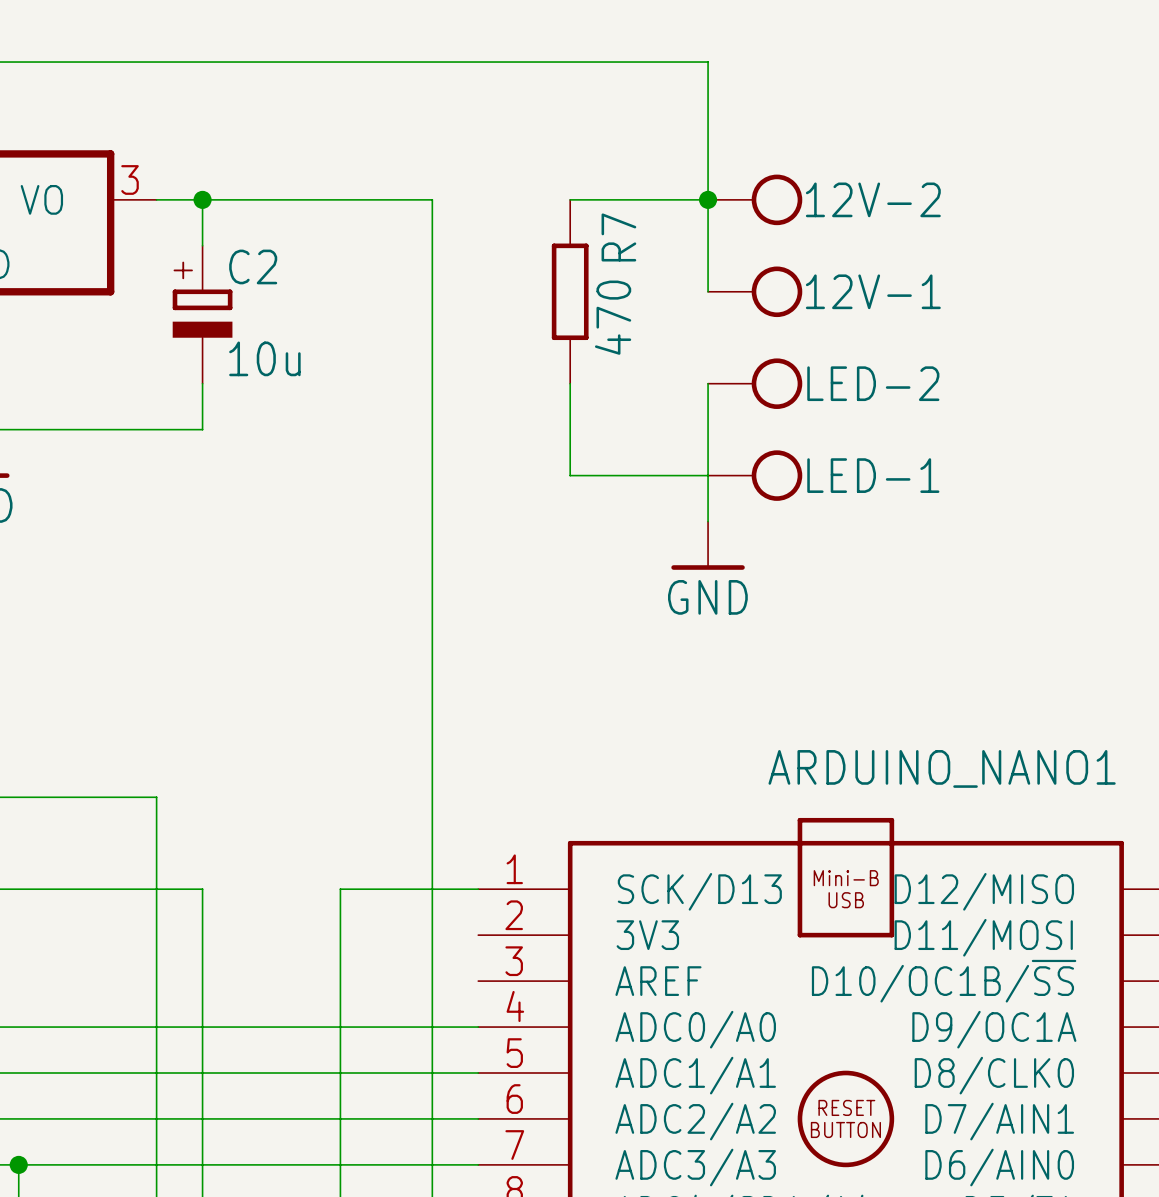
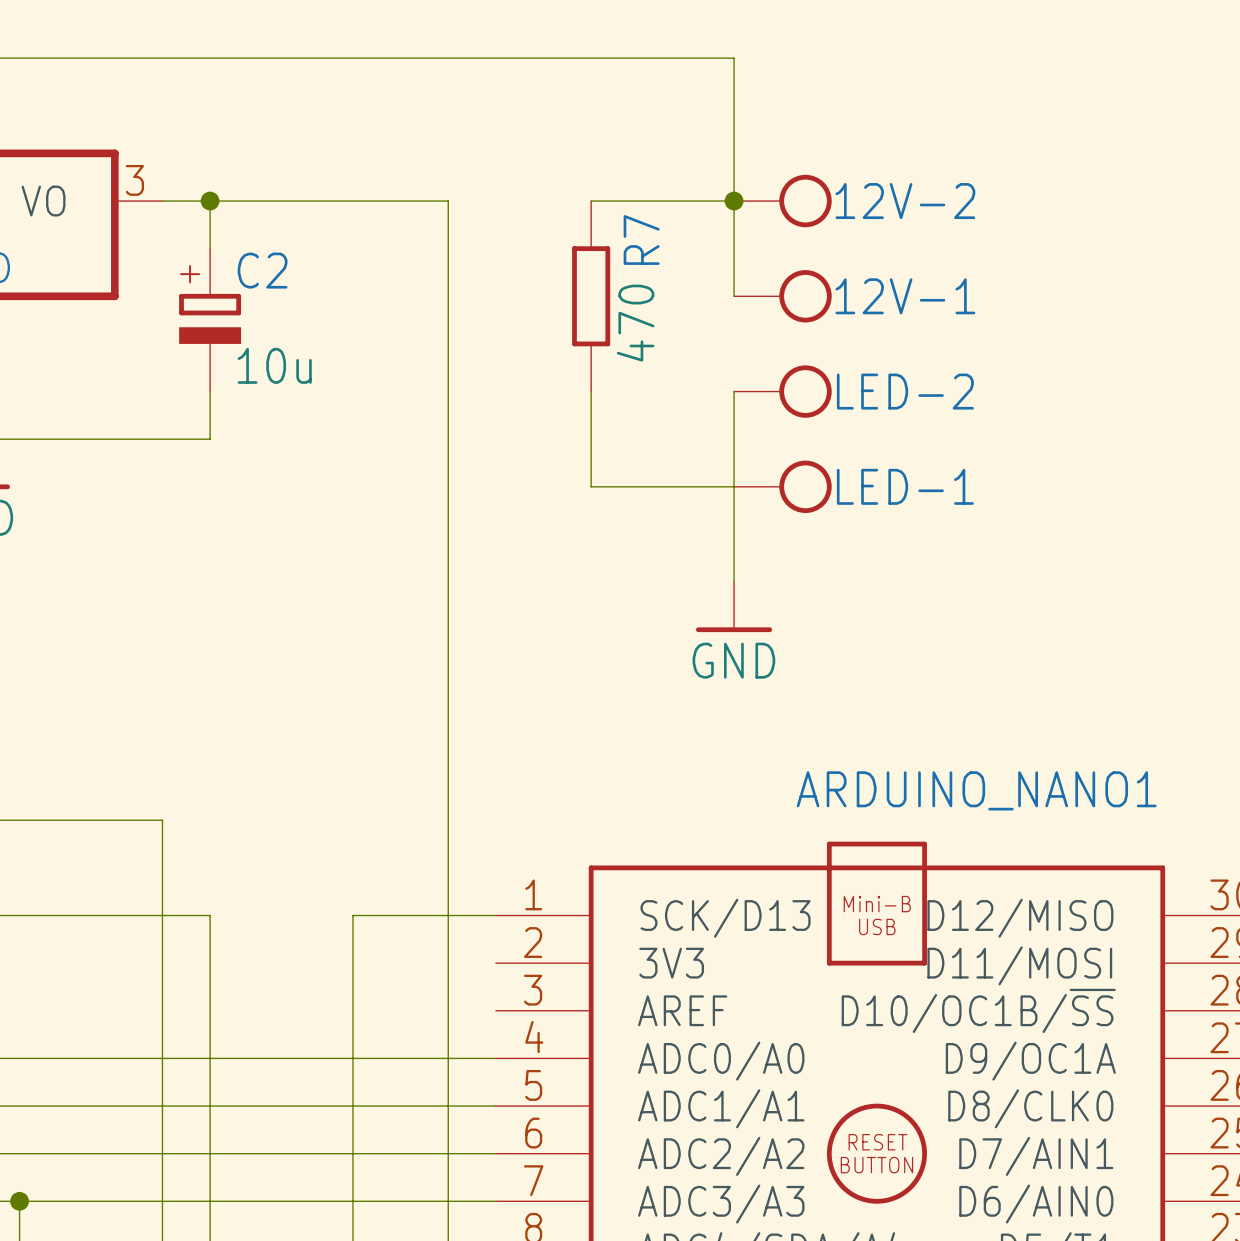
power symbol position: GND (708, 545) -> GND (734, 607)

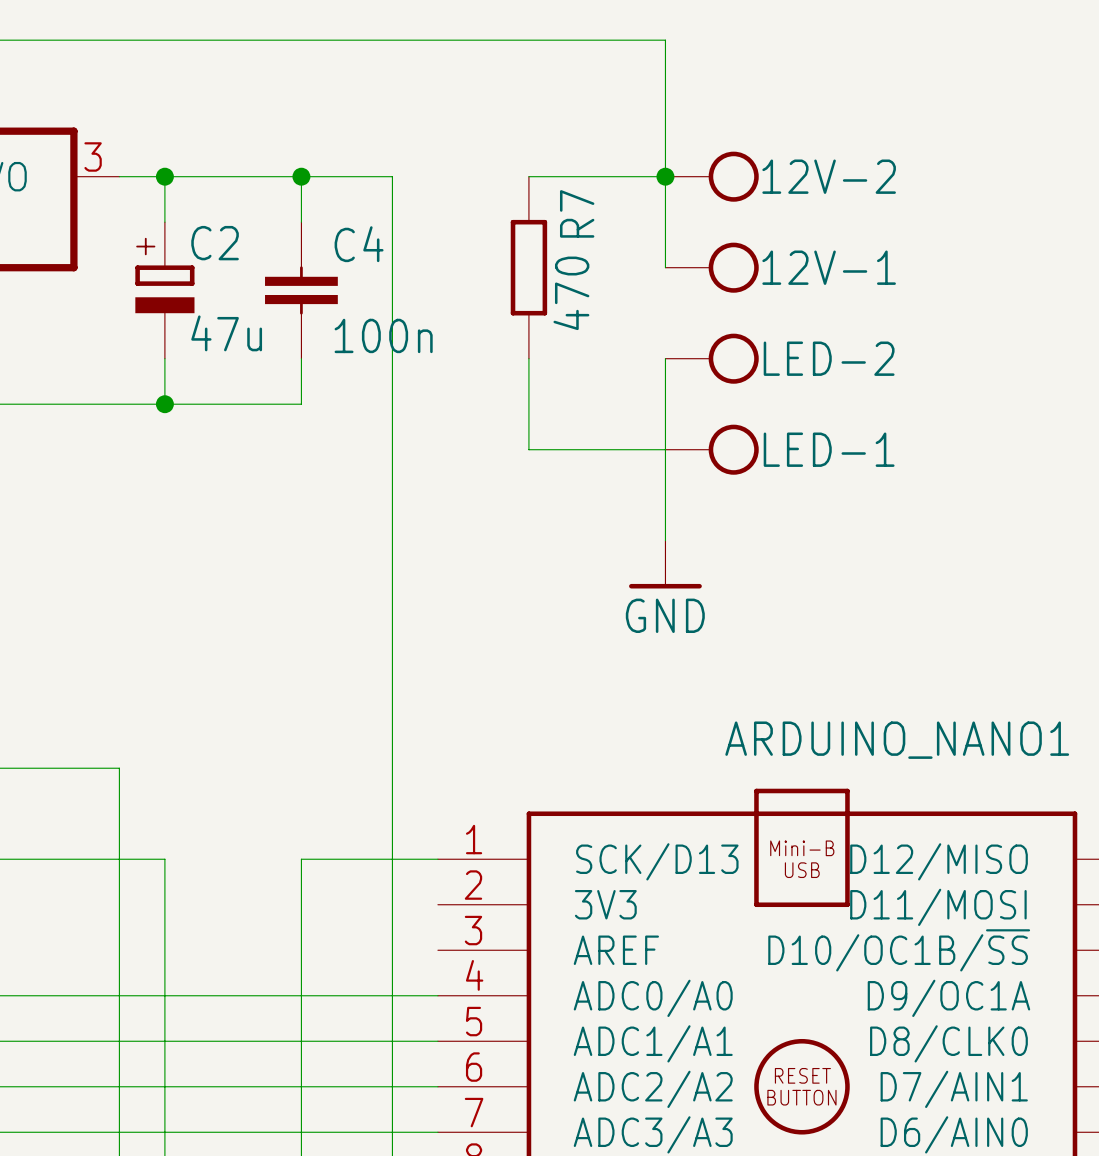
wire: none -> (301, 176) (301, 222)
junction: none -> (301, 176)
C4: none -> 100n (301, 290)
C2 value: 10u (274, 365) -> 47u (226, 333)
wire: none -> (301, 358) (301, 404) (164, 404)
junction: none -> (164, 404)

